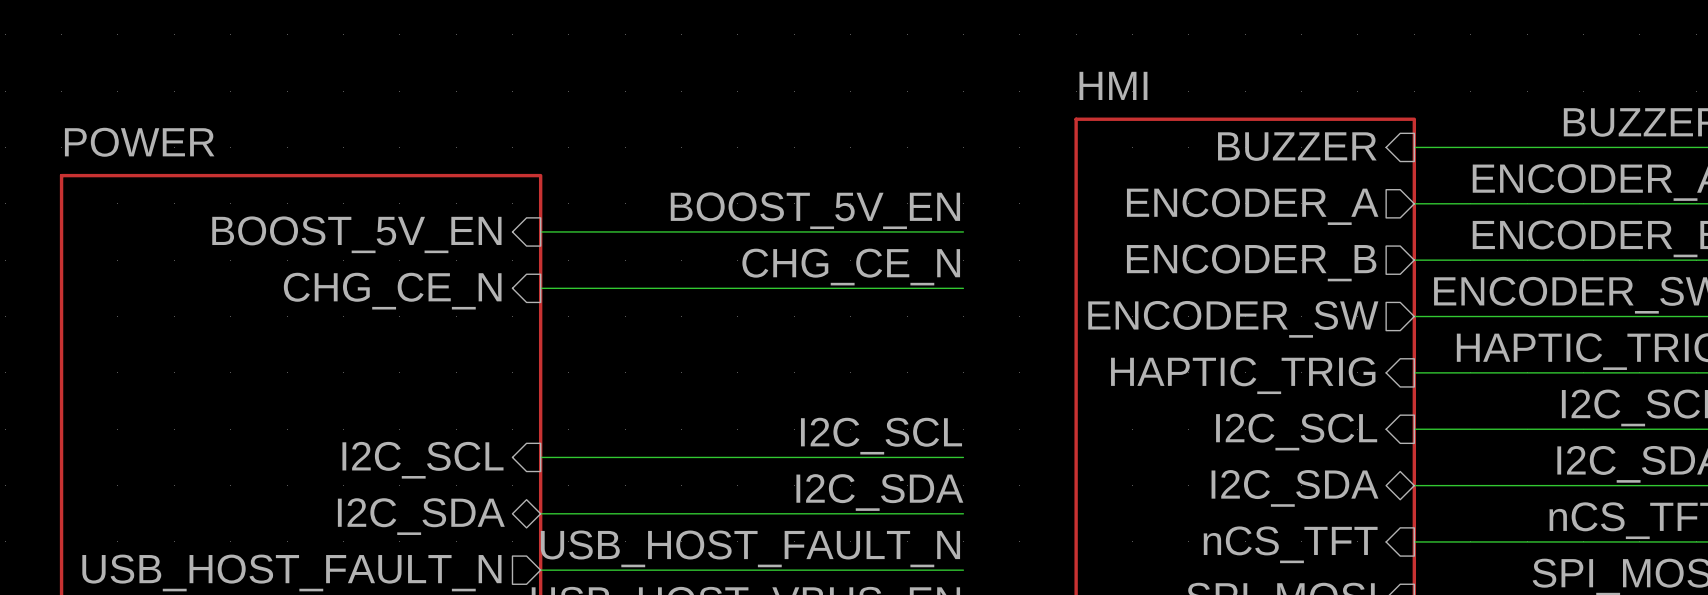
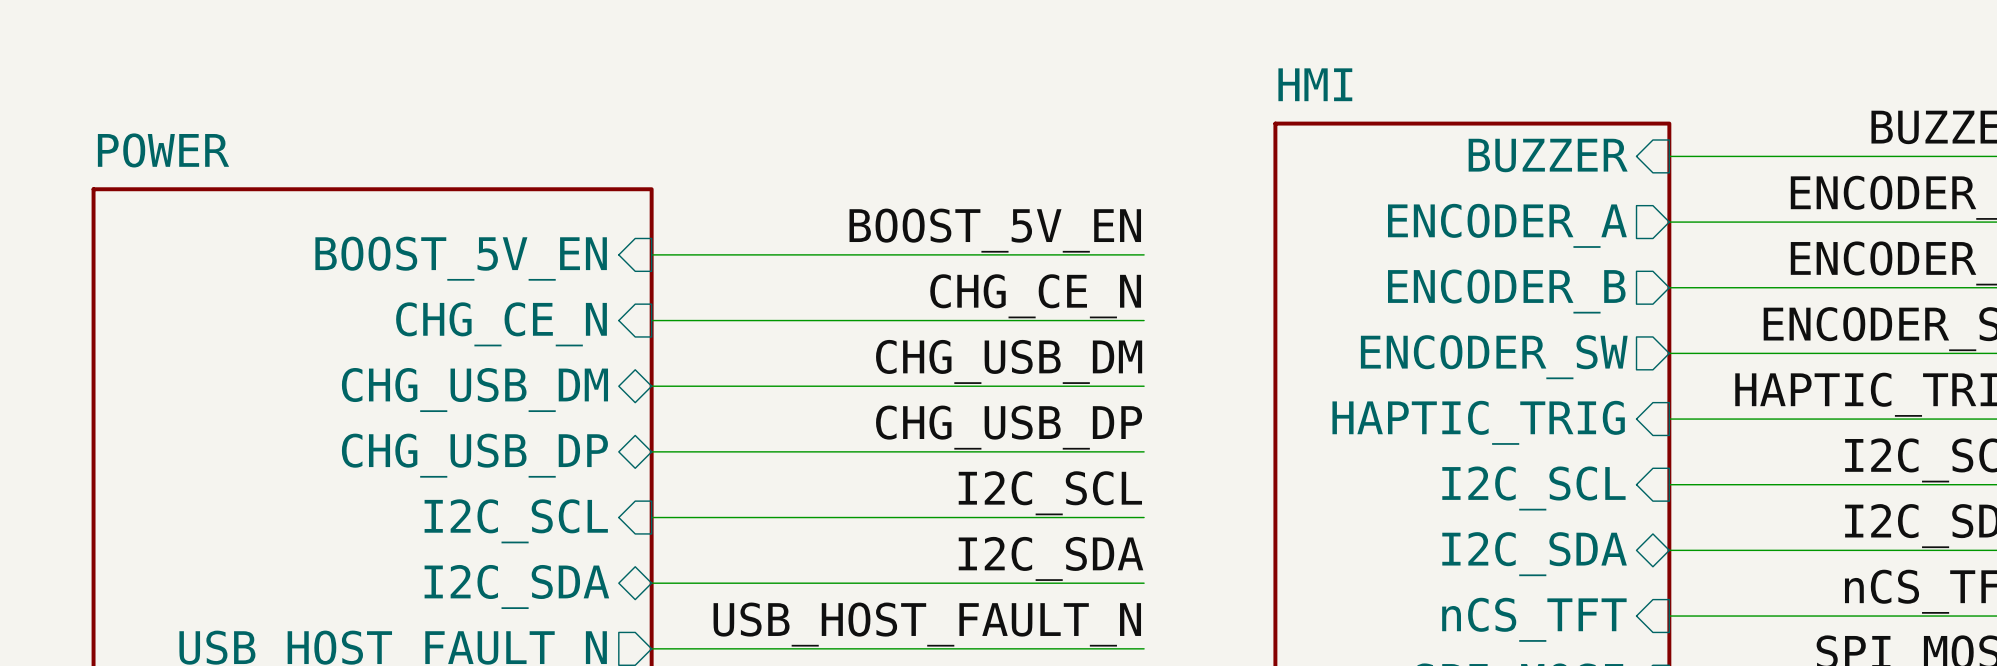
label: none -> CHG_USB_DM (1009, 361)
wire: none -> (651, 386) (1144, 386)
sheet pin: none -> CHG_USB_DM (474, 390)
label: none -> CHG_USB_DP (1009, 427)
wire: none -> (651, 451) (1144, 451)
sheet pin: none -> CHG_USB_DP (474, 455)

